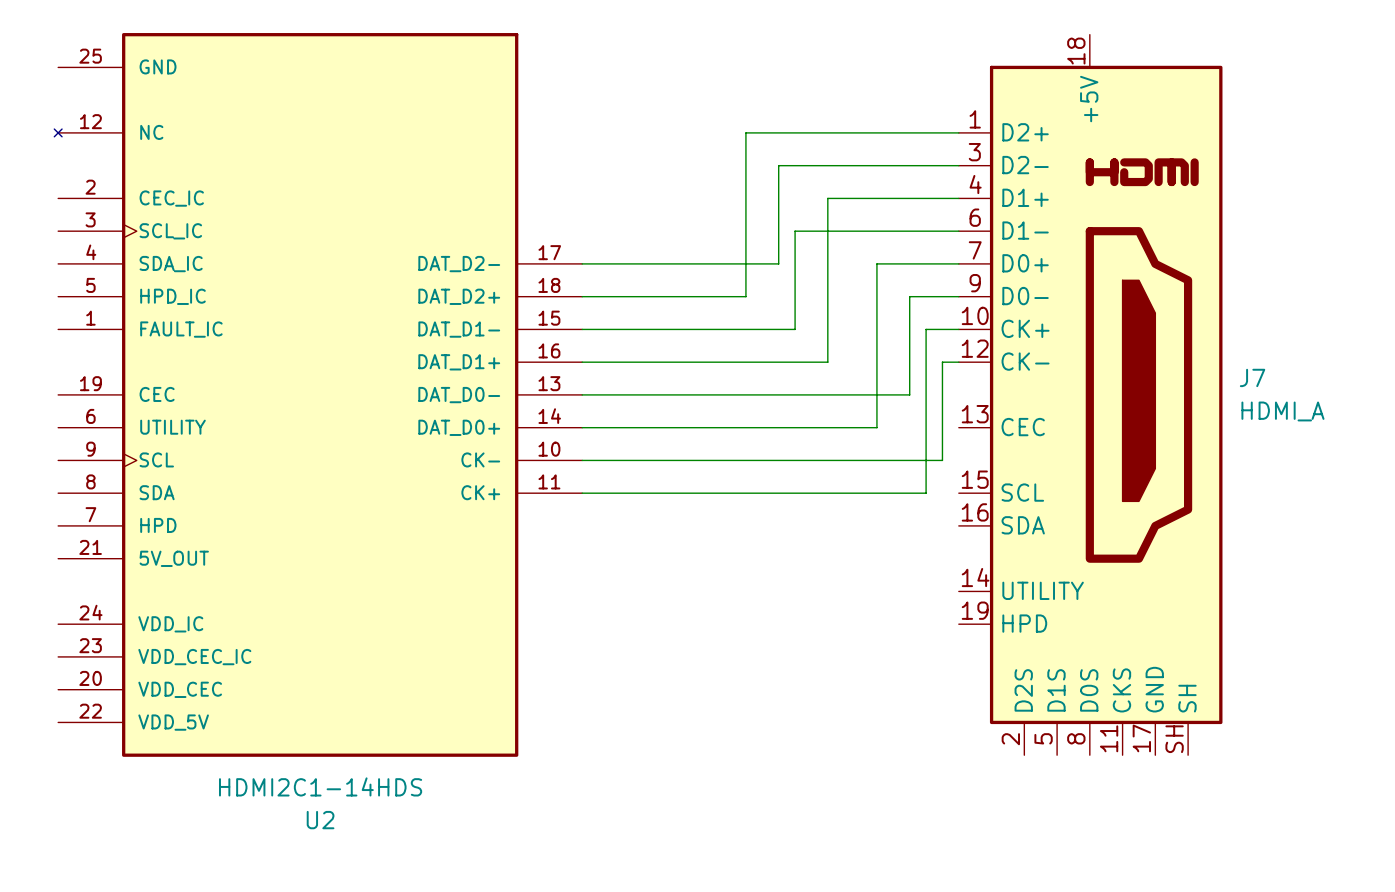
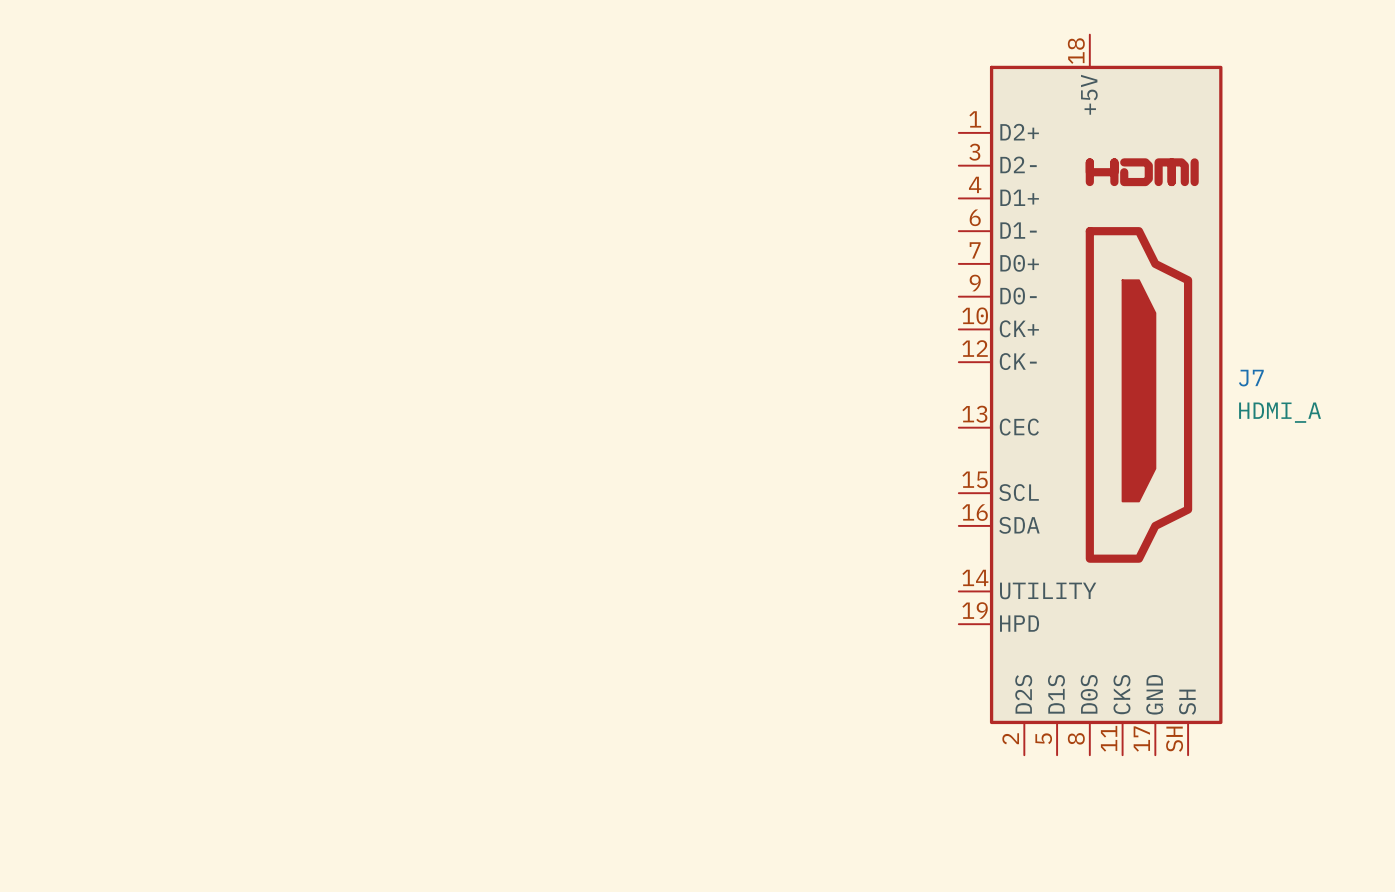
wire: (958, 132) (745, 132) (745, 296) (582, 296) -> none
wire: (958, 165) (778, 165) (778, 263) (582, 263) -> none
wire: (958, 198) (827, 198) (827, 362) (582, 362) -> none
wire: (958, 231) (795, 231) (795, 329) (582, 329) -> none
wire: (958, 263) (876, 263) (876, 427) (582, 427) -> none
wire: (958, 296) (909, 296) (909, 394) (582, 394) -> none
wire: (958, 329) (926, 329) (926, 493) (582, 493) -> none
wire: (958, 362) (942, 362) (942, 460) (582, 460) -> none
U2: HDMI2C1-14HDS (318, 394) -> none

